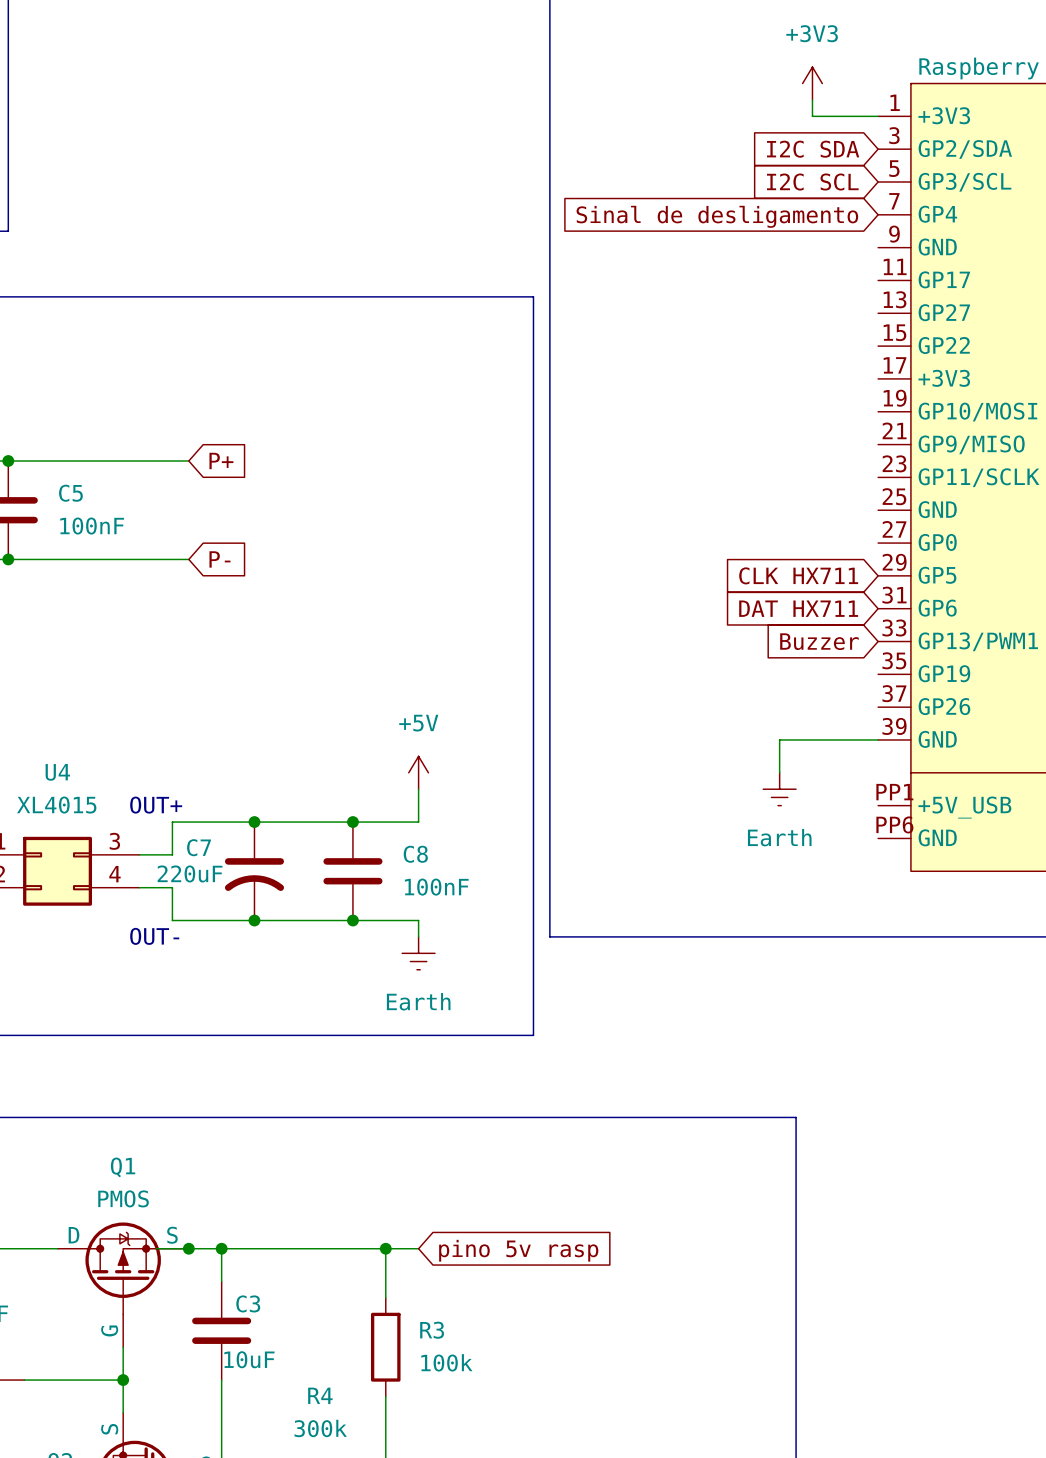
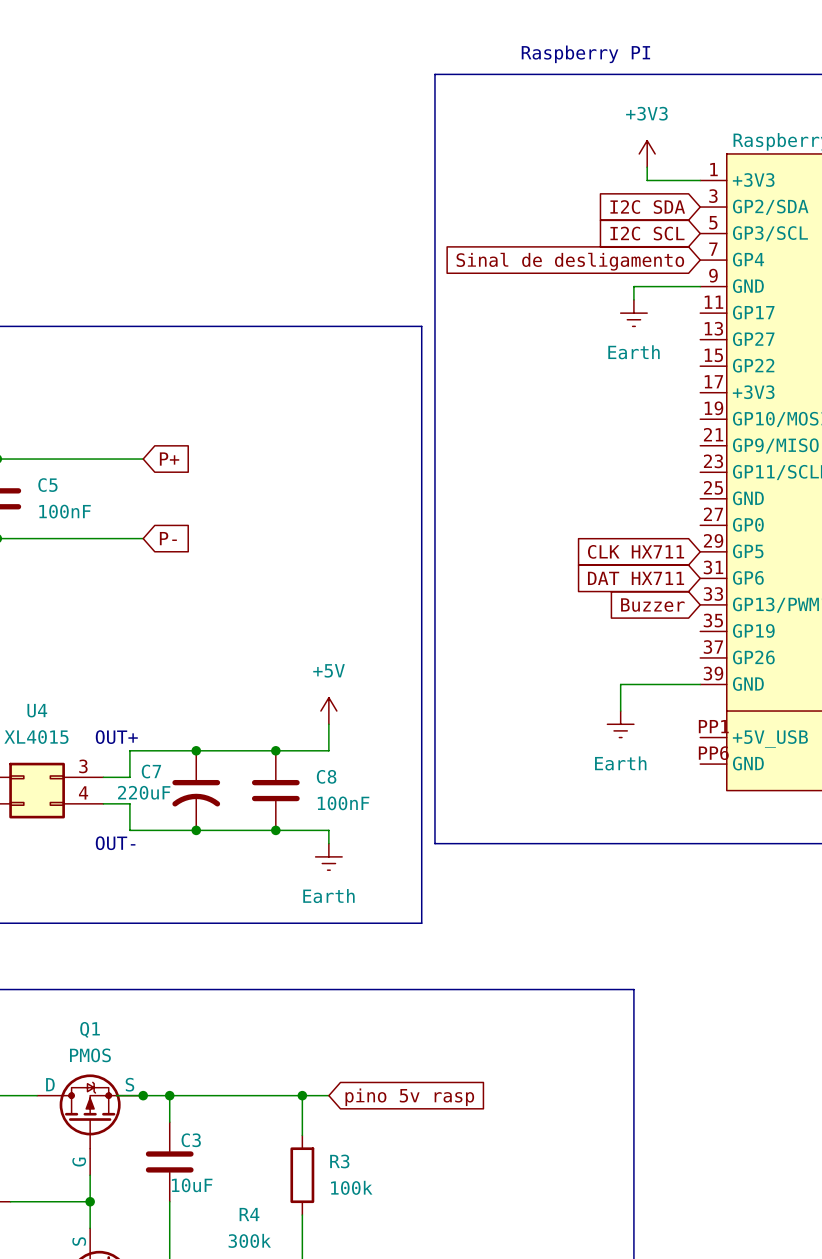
wire: none -> (700, 286) (633, 286) (633, 299)
power symbol: none -> Earth (633, 313)

